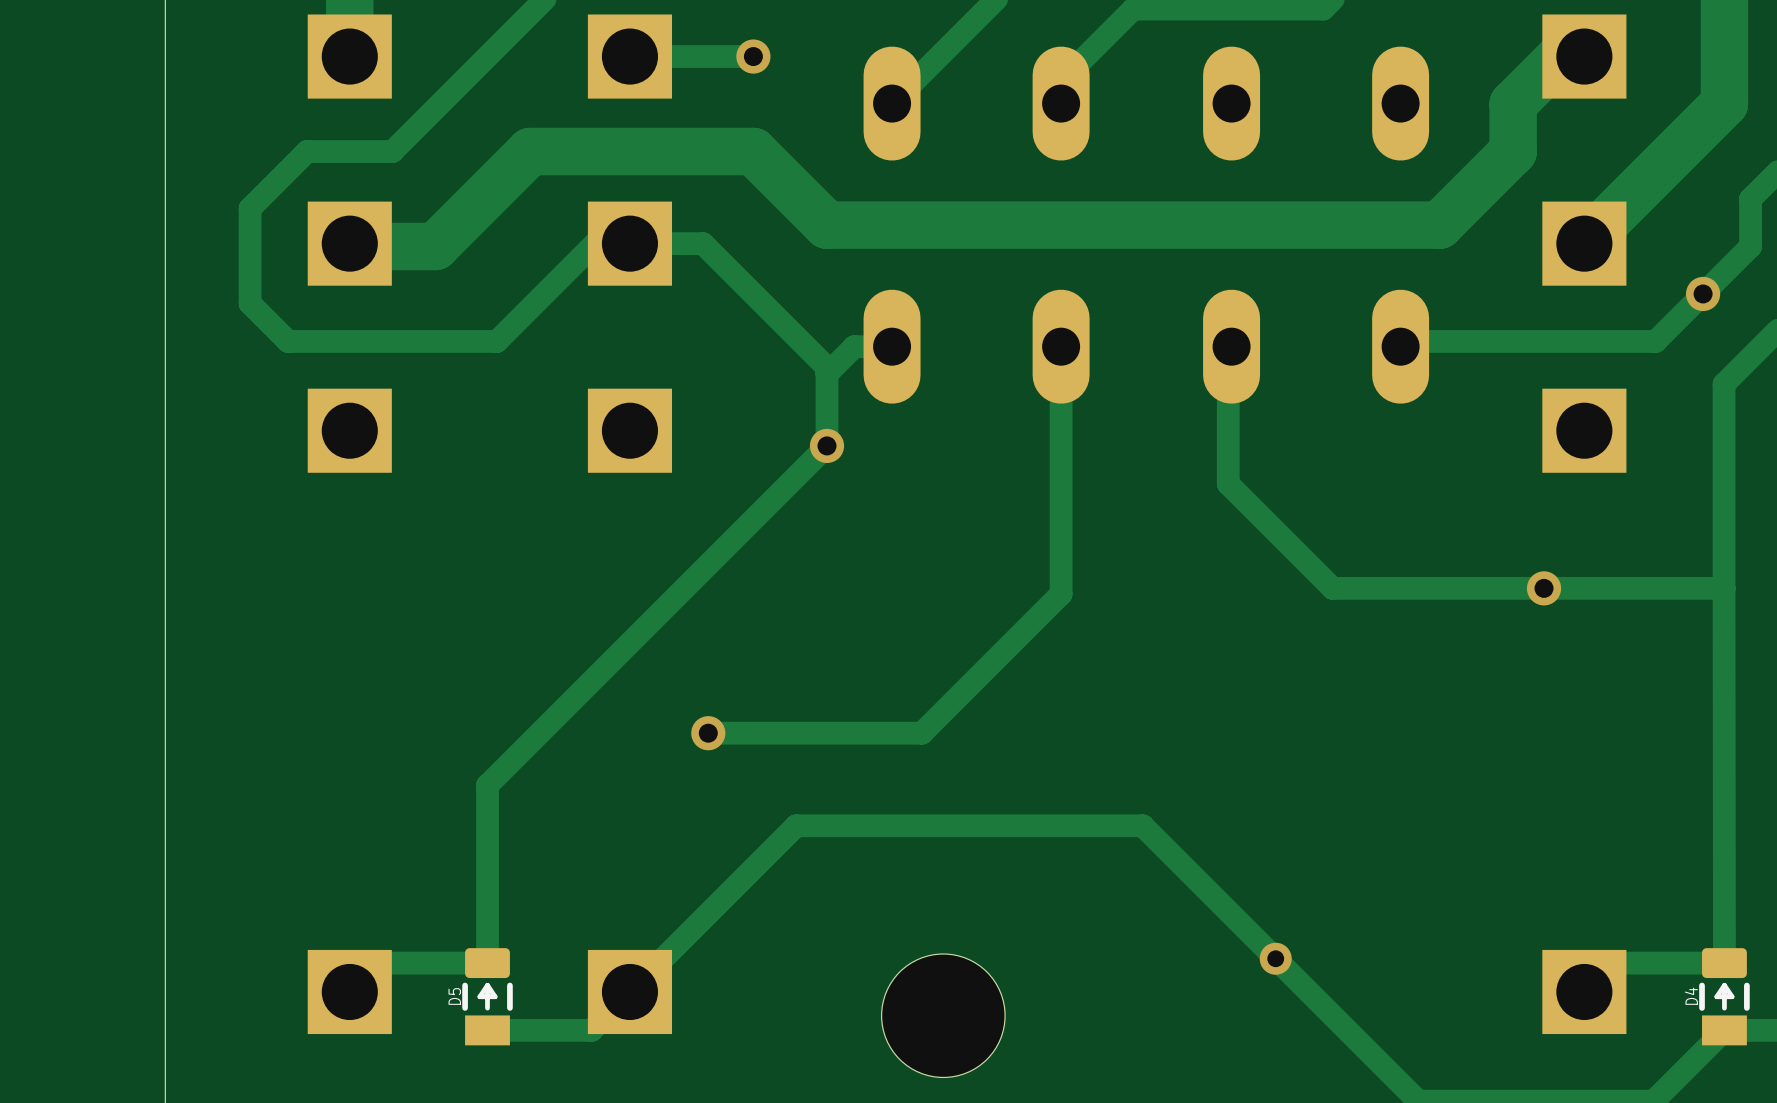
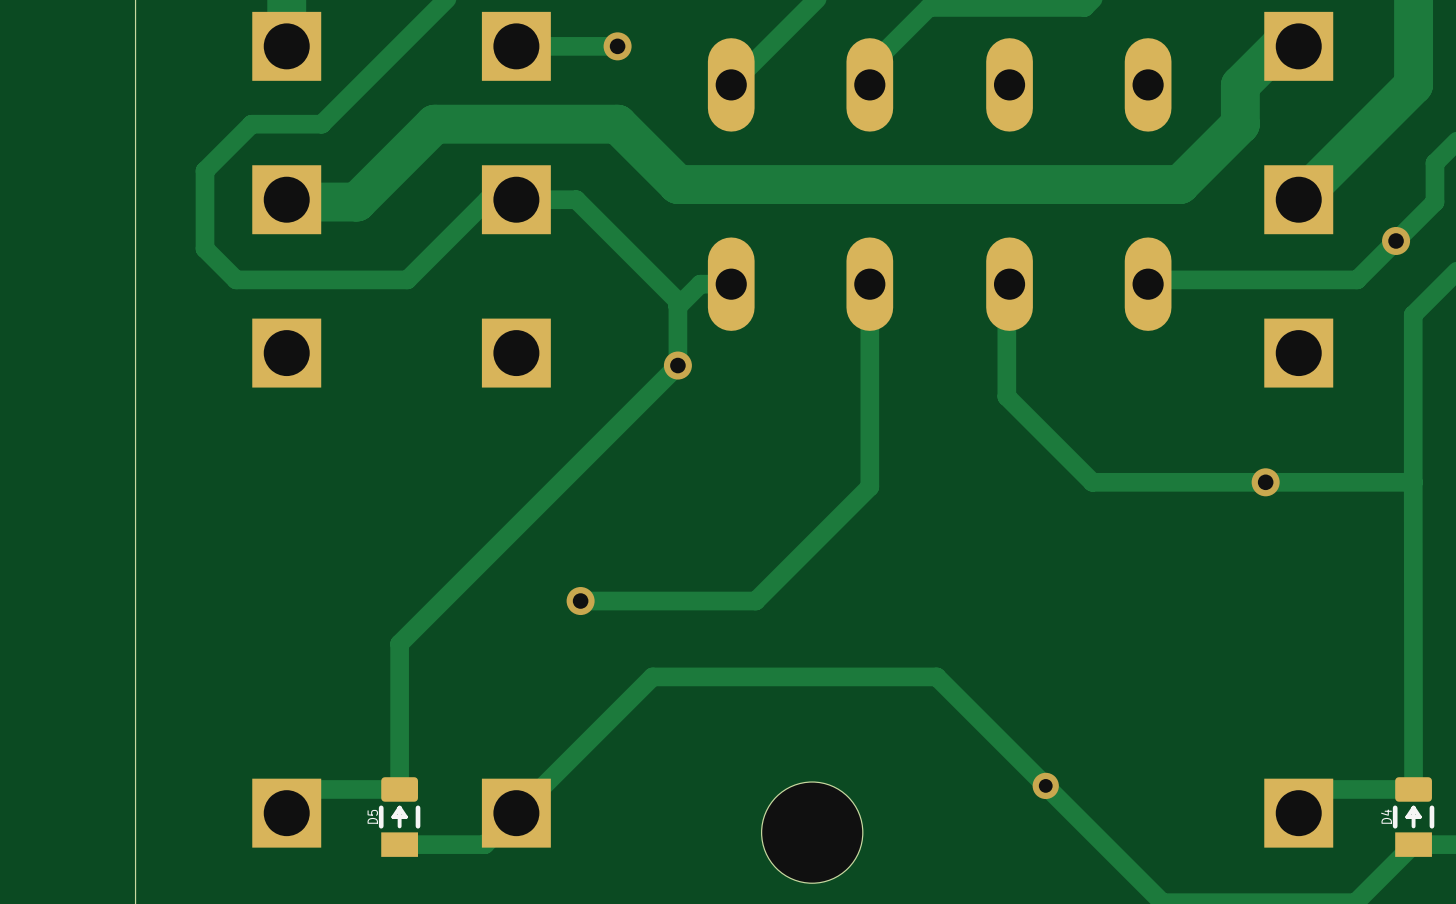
hole position: (943, 1015) -> (812, 832)

